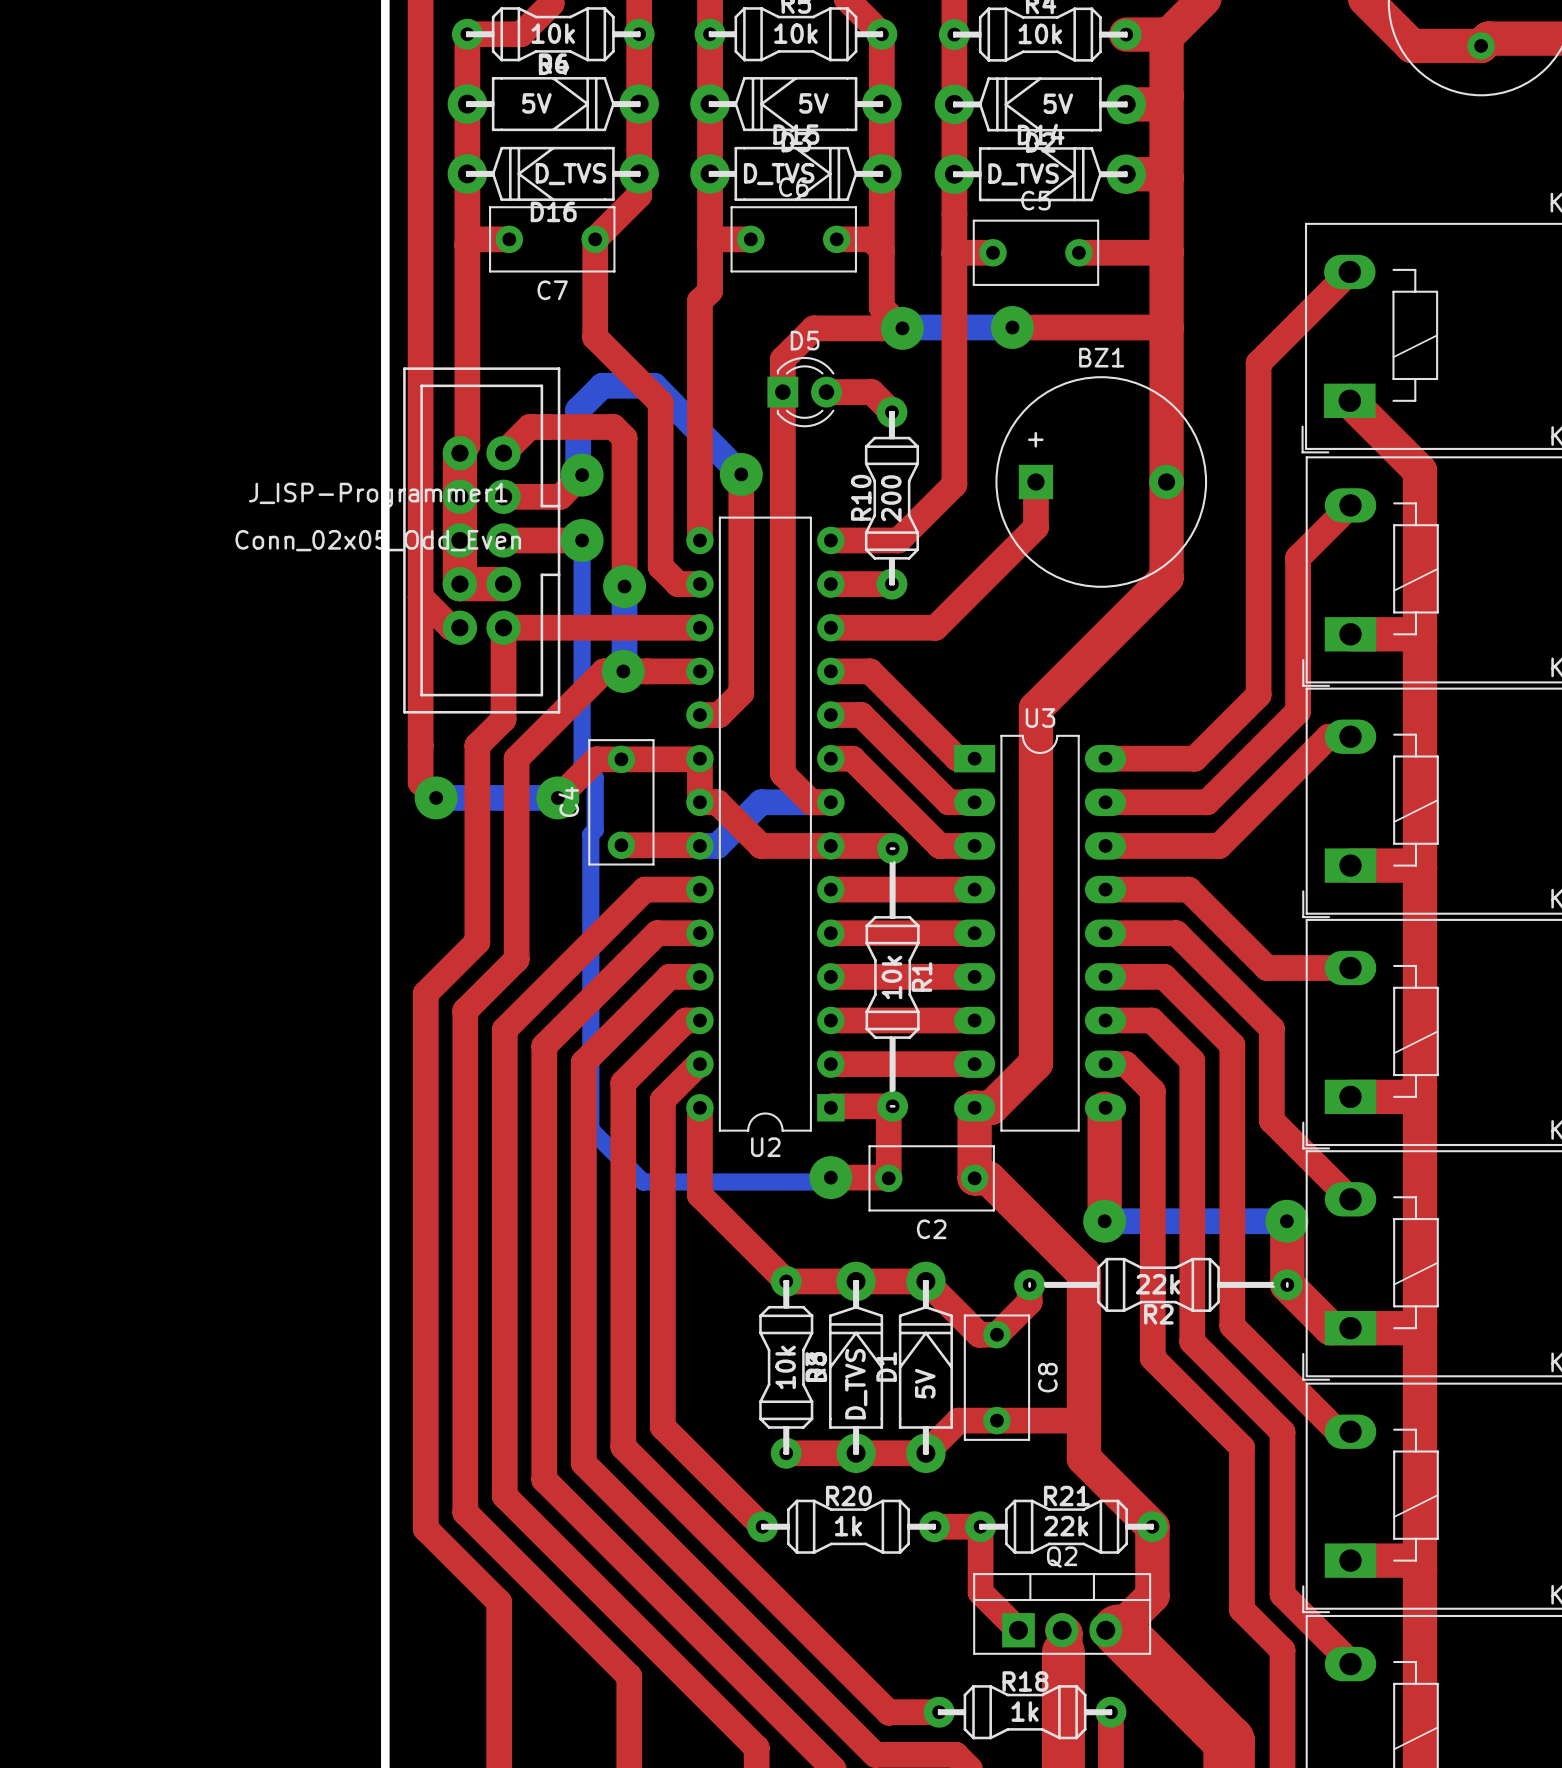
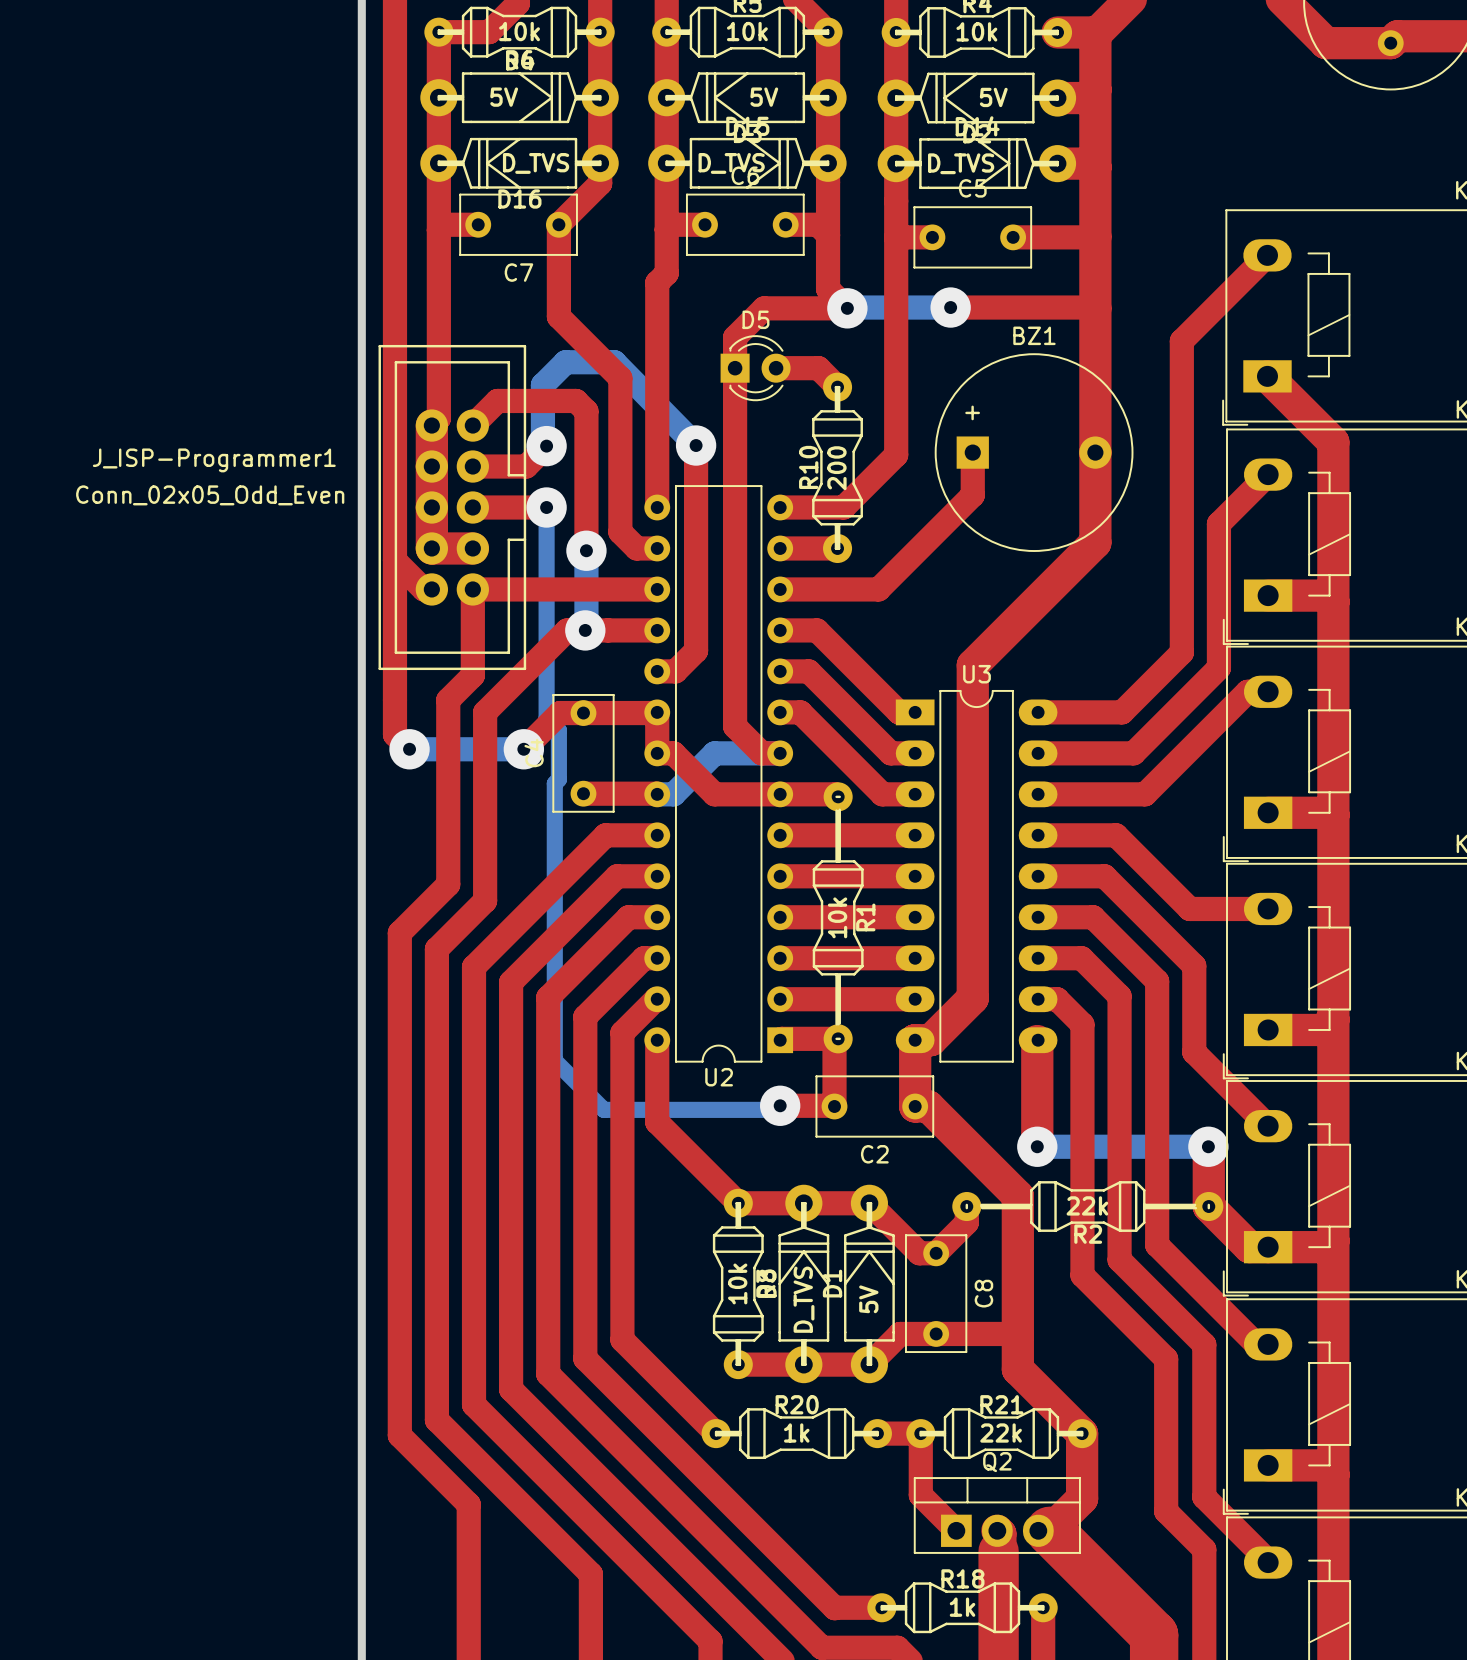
J_ISP-Programmer1 name position: J_ISP-Programmer1 (378, 495) -> J_ISP-Programmer1 (214, 460)
J_ISP-Programmer1 value position: Conn_02x05_Odd_Even (378, 540) -> Conn_02x05_Odd_Even (210, 495)

